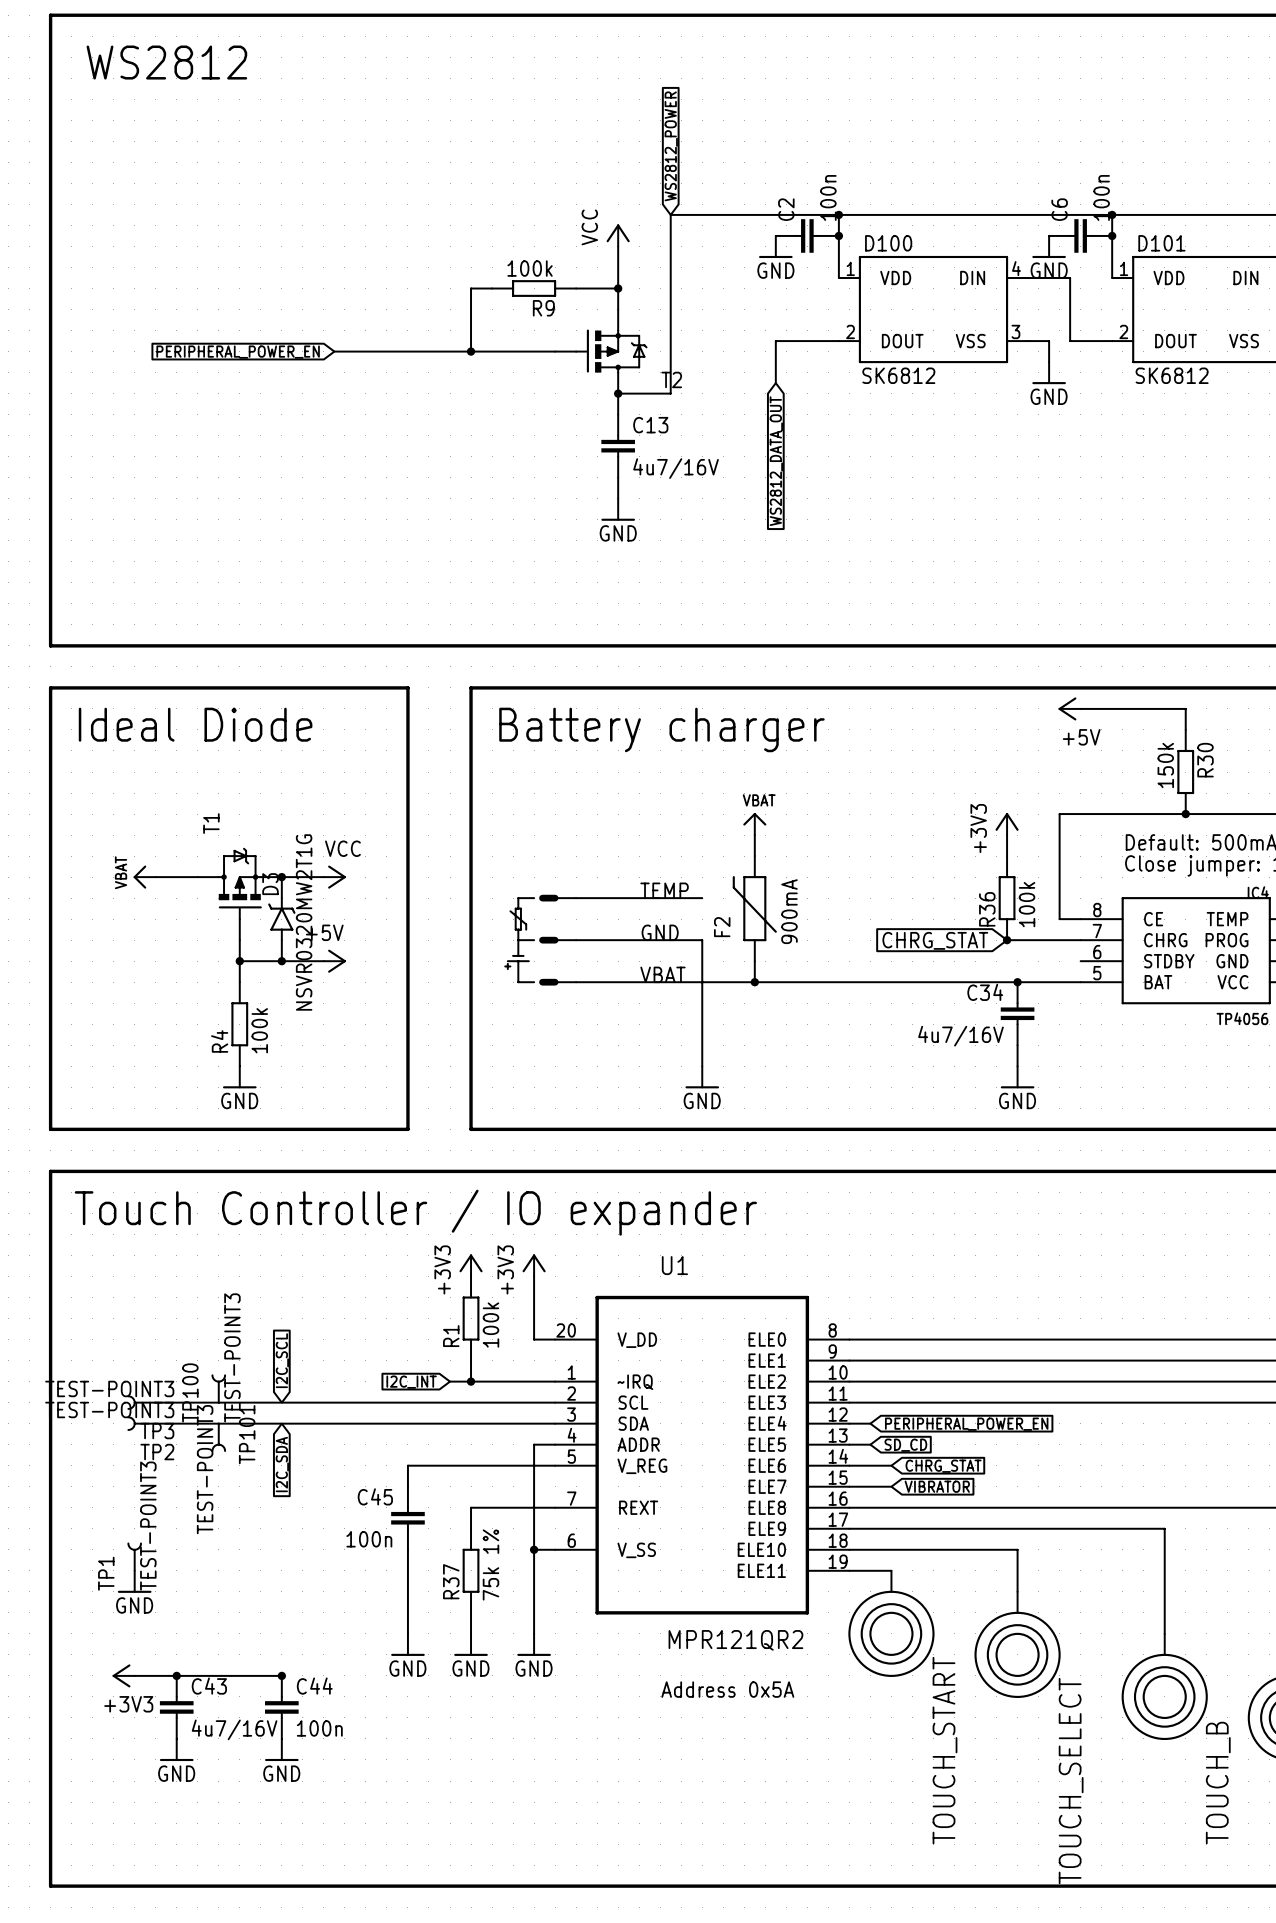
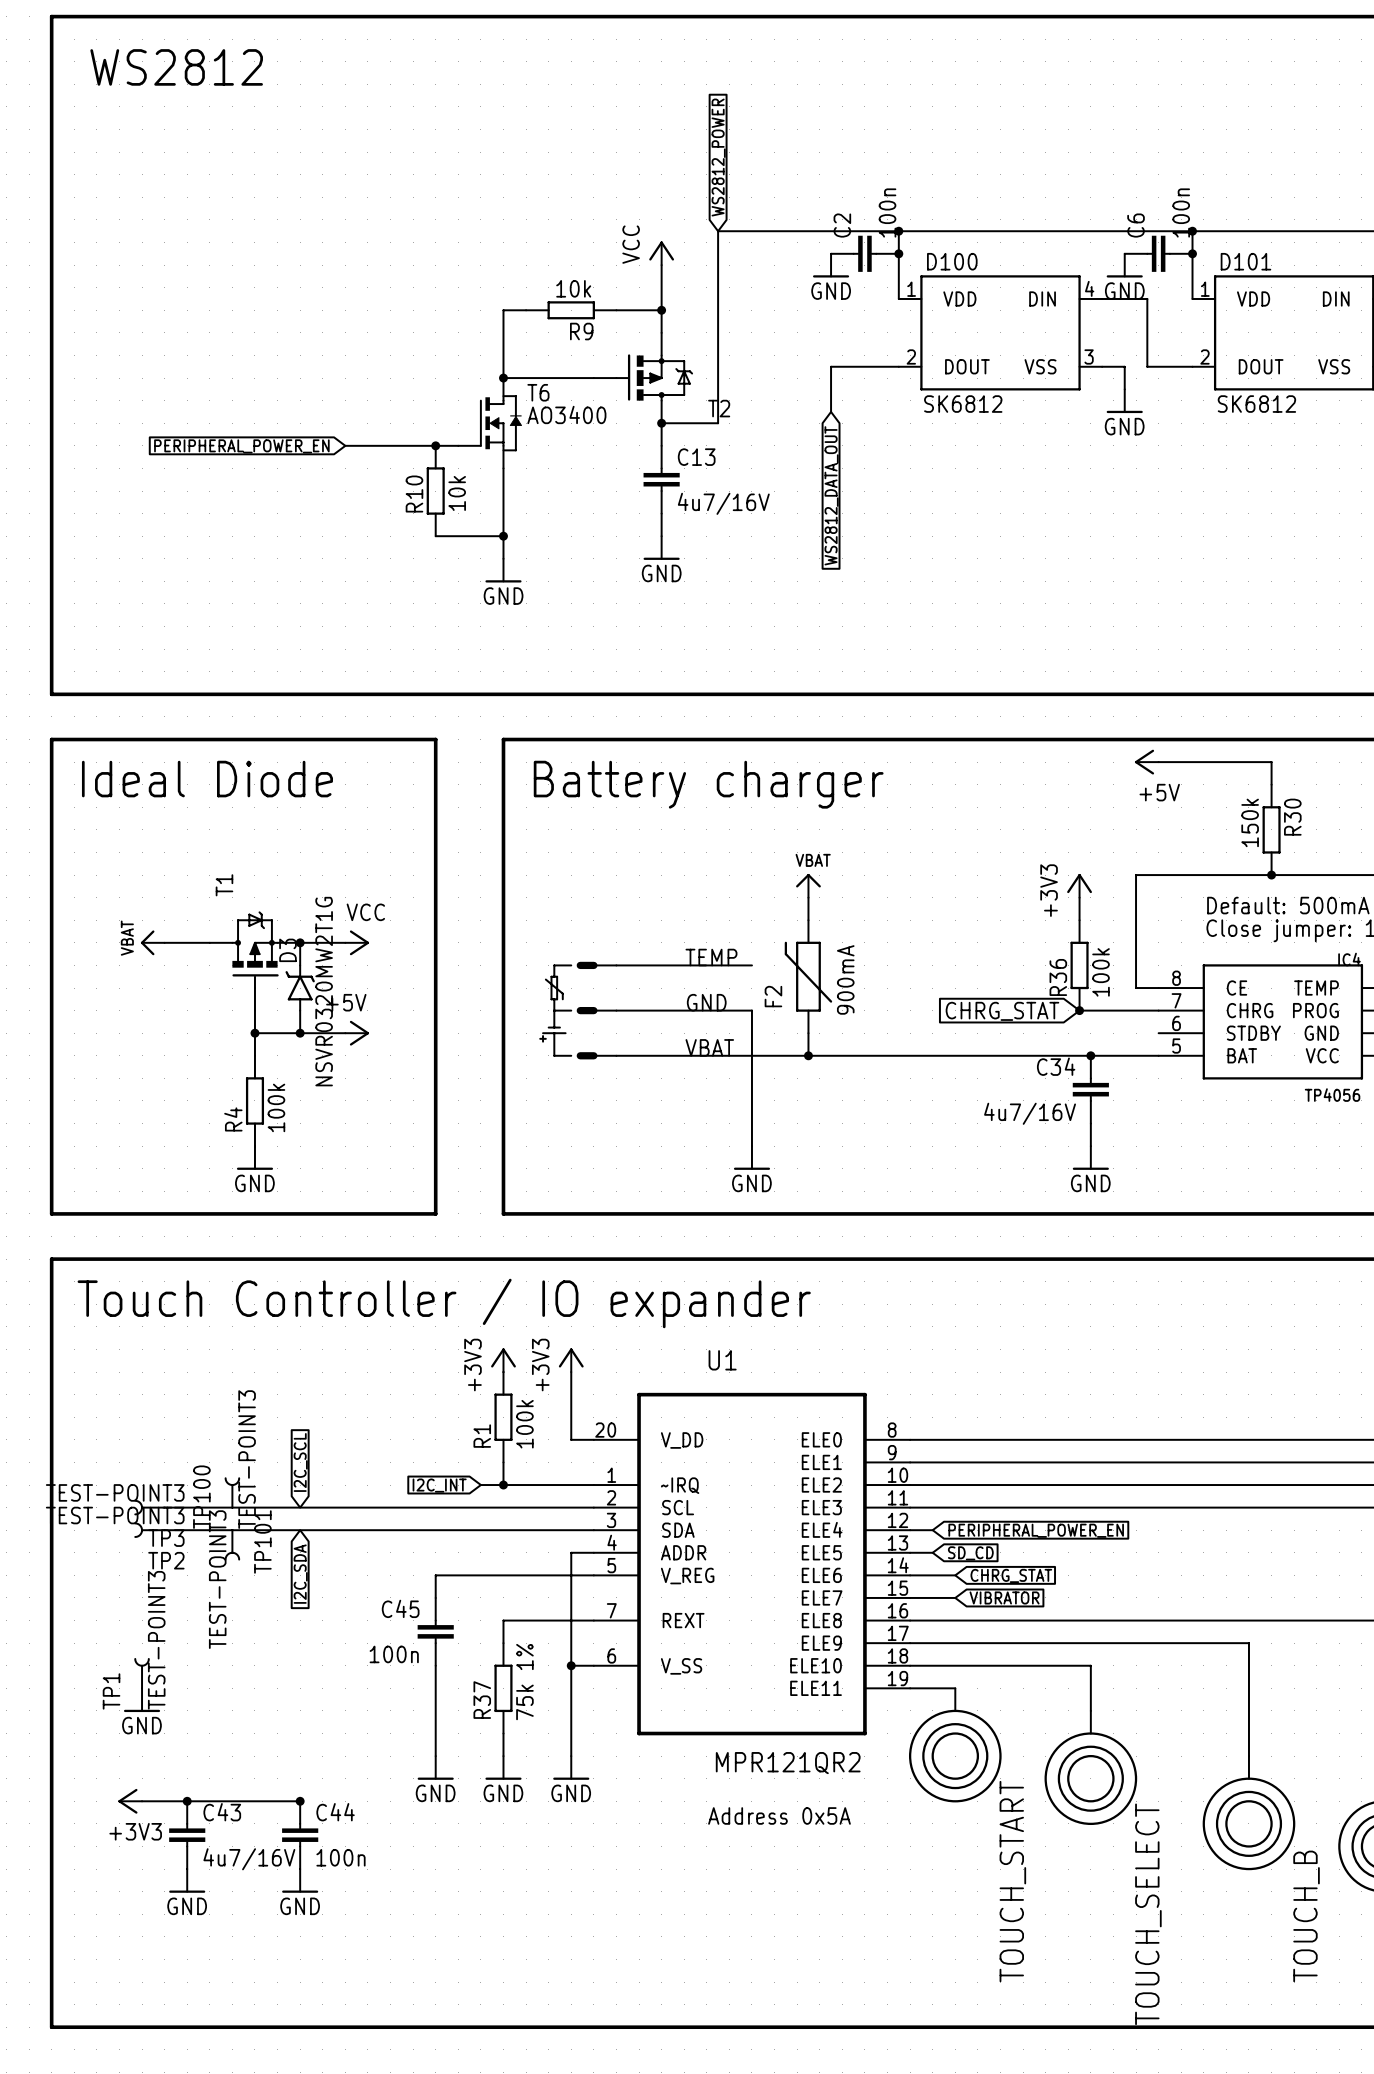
R9 value: 100k (530, 268) -> 10k (573, 288)
wire: (334, 351) (471, 351) -> none
global label position: PERIPHERAL_POWER_EN (238, 352) -> PERIPHERAL_POWER_EN (241, 446)
T6: none -> AO3400 (490, 423)
wire: none -> (345, 445) (458, 445)
junction: none -> (435, 445)
wire: none -> (503, 468) (503, 558)
R10: none -> 10k (435, 491)
wire: none -> (435, 536) (503, 536)
junction: none -> (503, 536)
power symbol: none -> GND (503, 570)

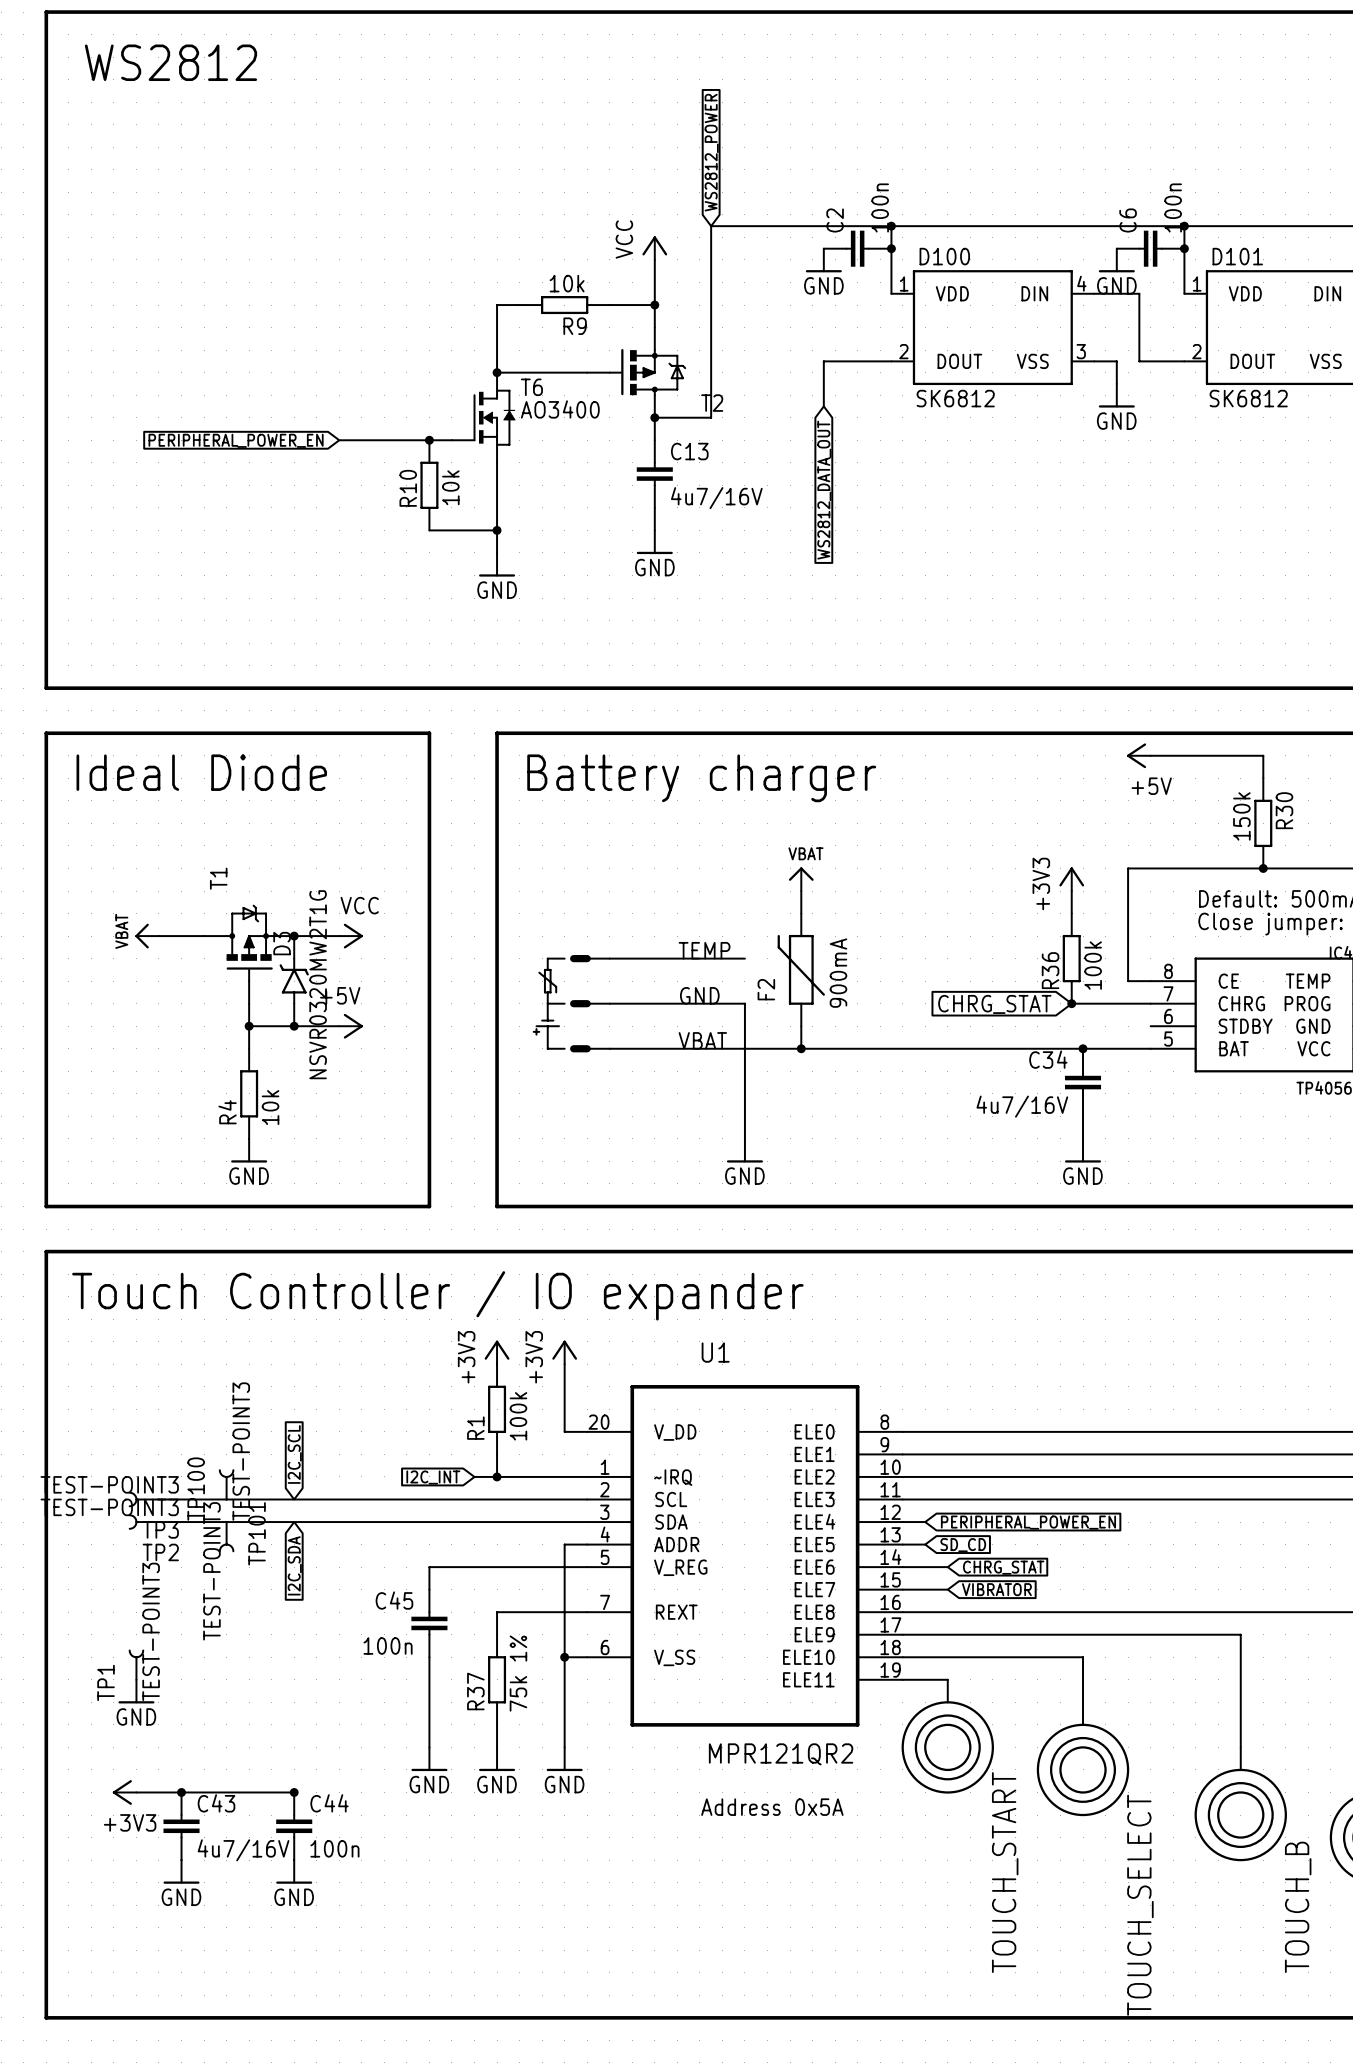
R4 value: 100k (276, 1107) -> 10k (270, 1107)

